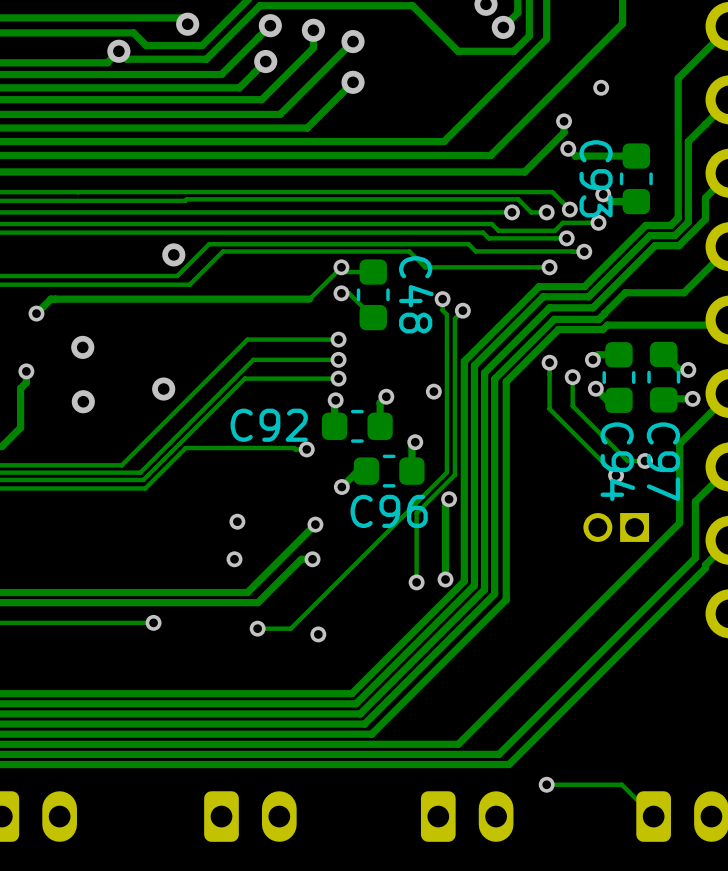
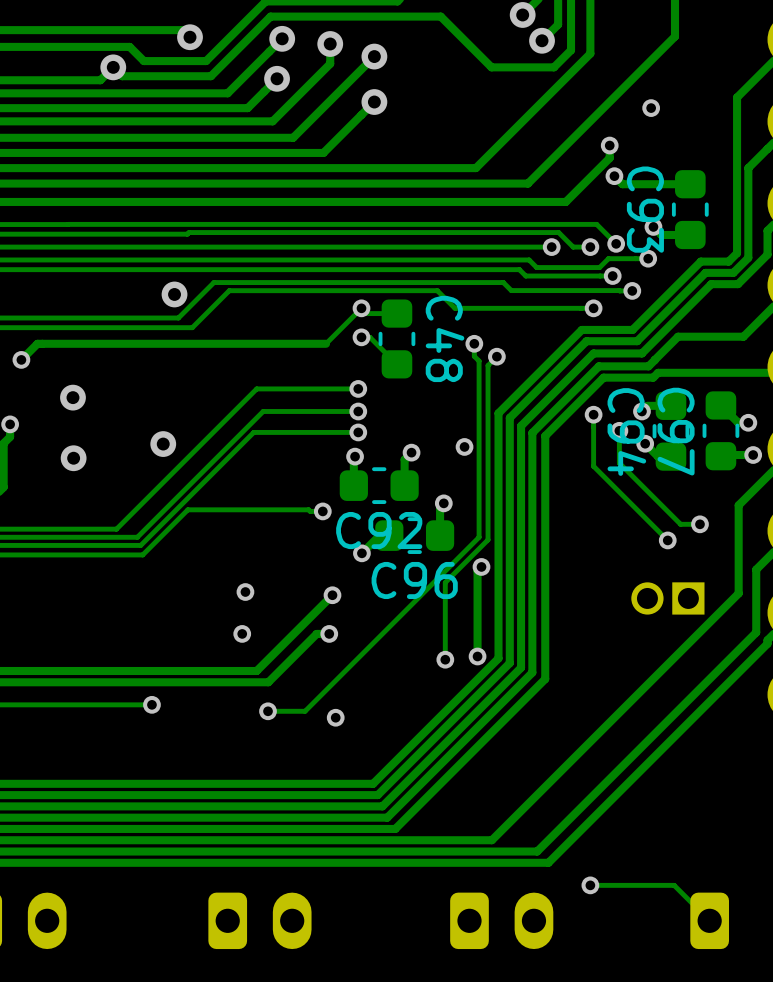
C92 name position: C92 (269, 425) -> C92 (379, 530)
C94 name position: C94 (617, 461) -> C94 (626, 432)
C97 name position: C97 (663, 461) -> C97 (676, 431)

